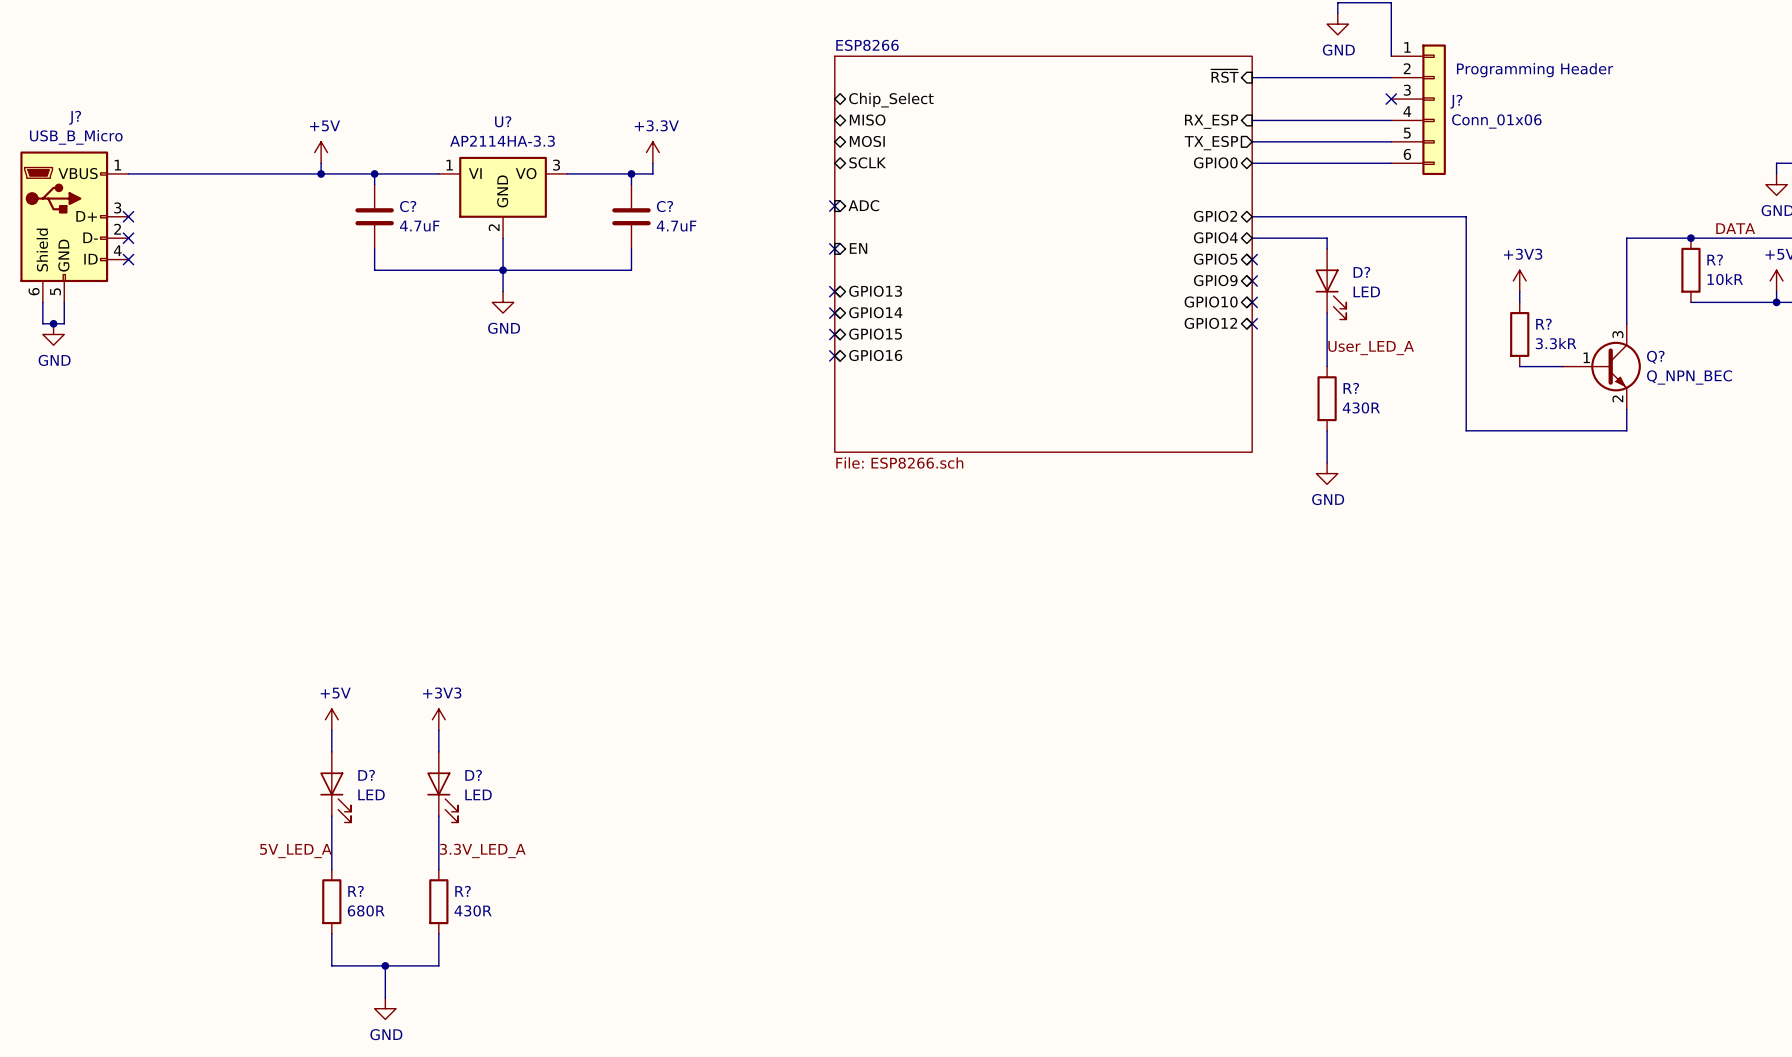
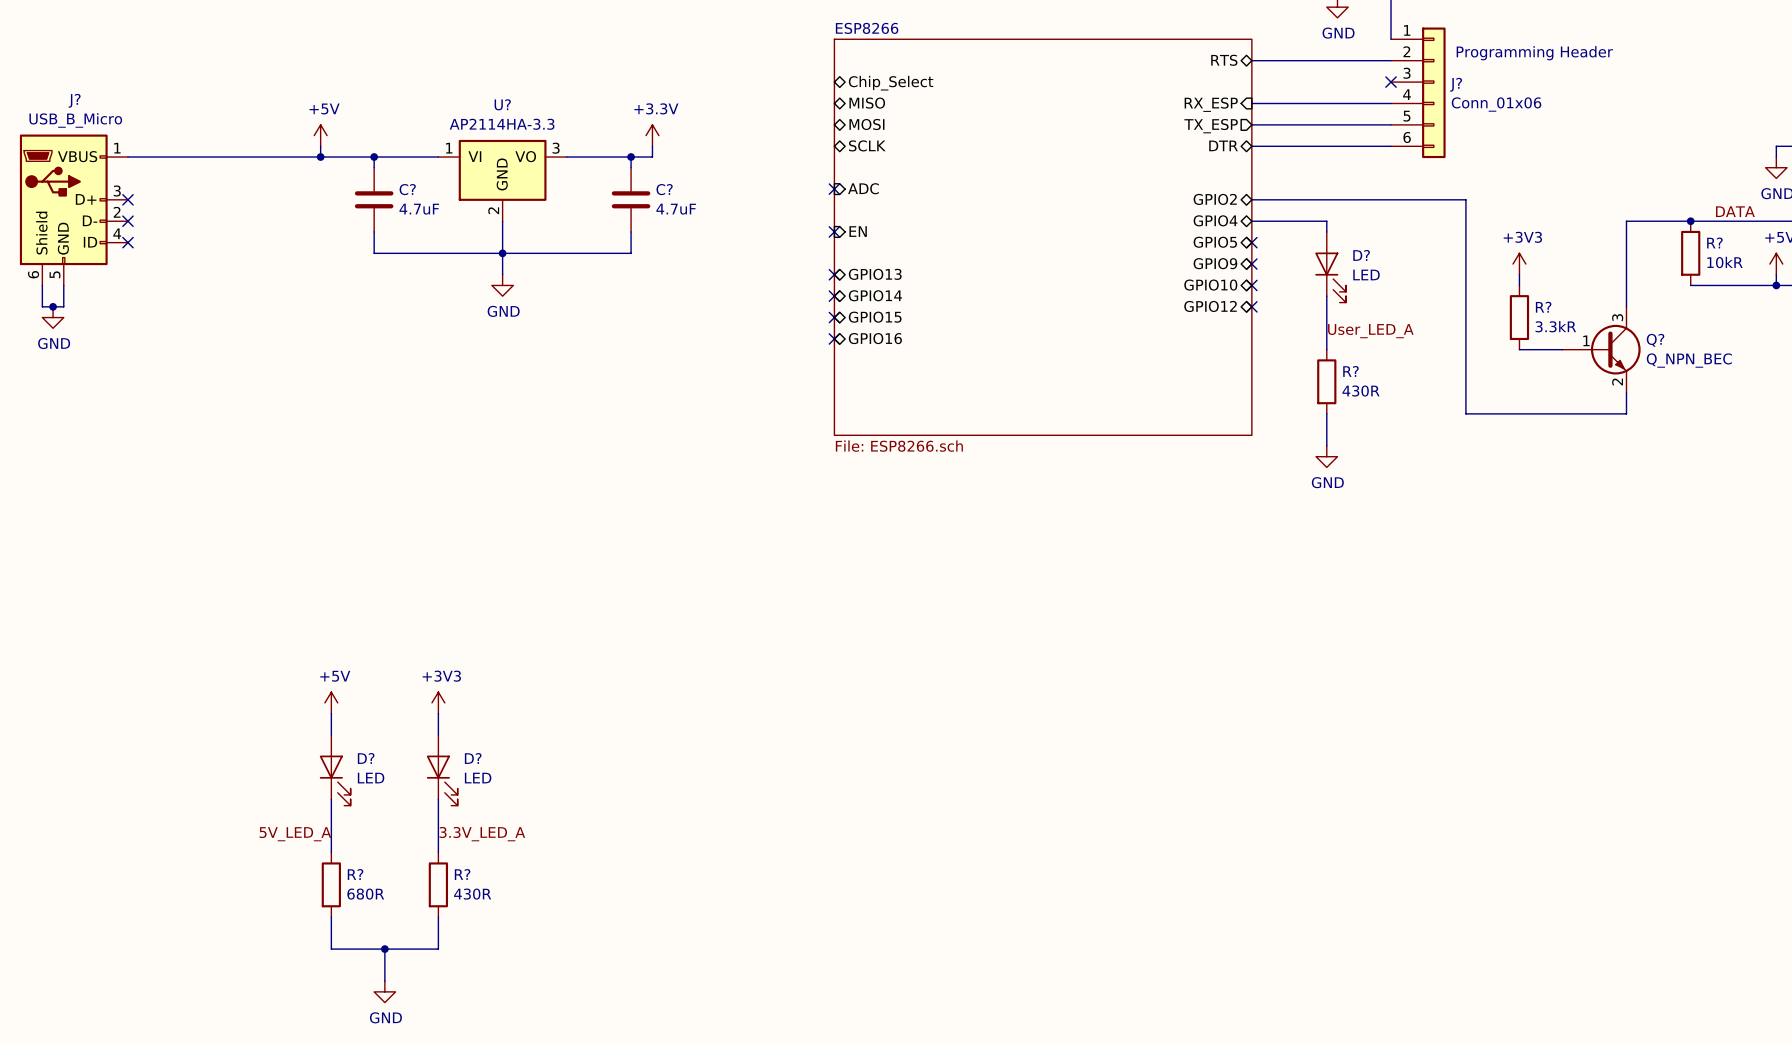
sheet pin shape: input (1224, 76) -> bidirectional (1224, 60)
sheet pin: ~{RST} (1224, 76) -> RTS (1224, 60)
sheet pin: GPIO0 (1215, 162) -> DTR (1223, 145)

